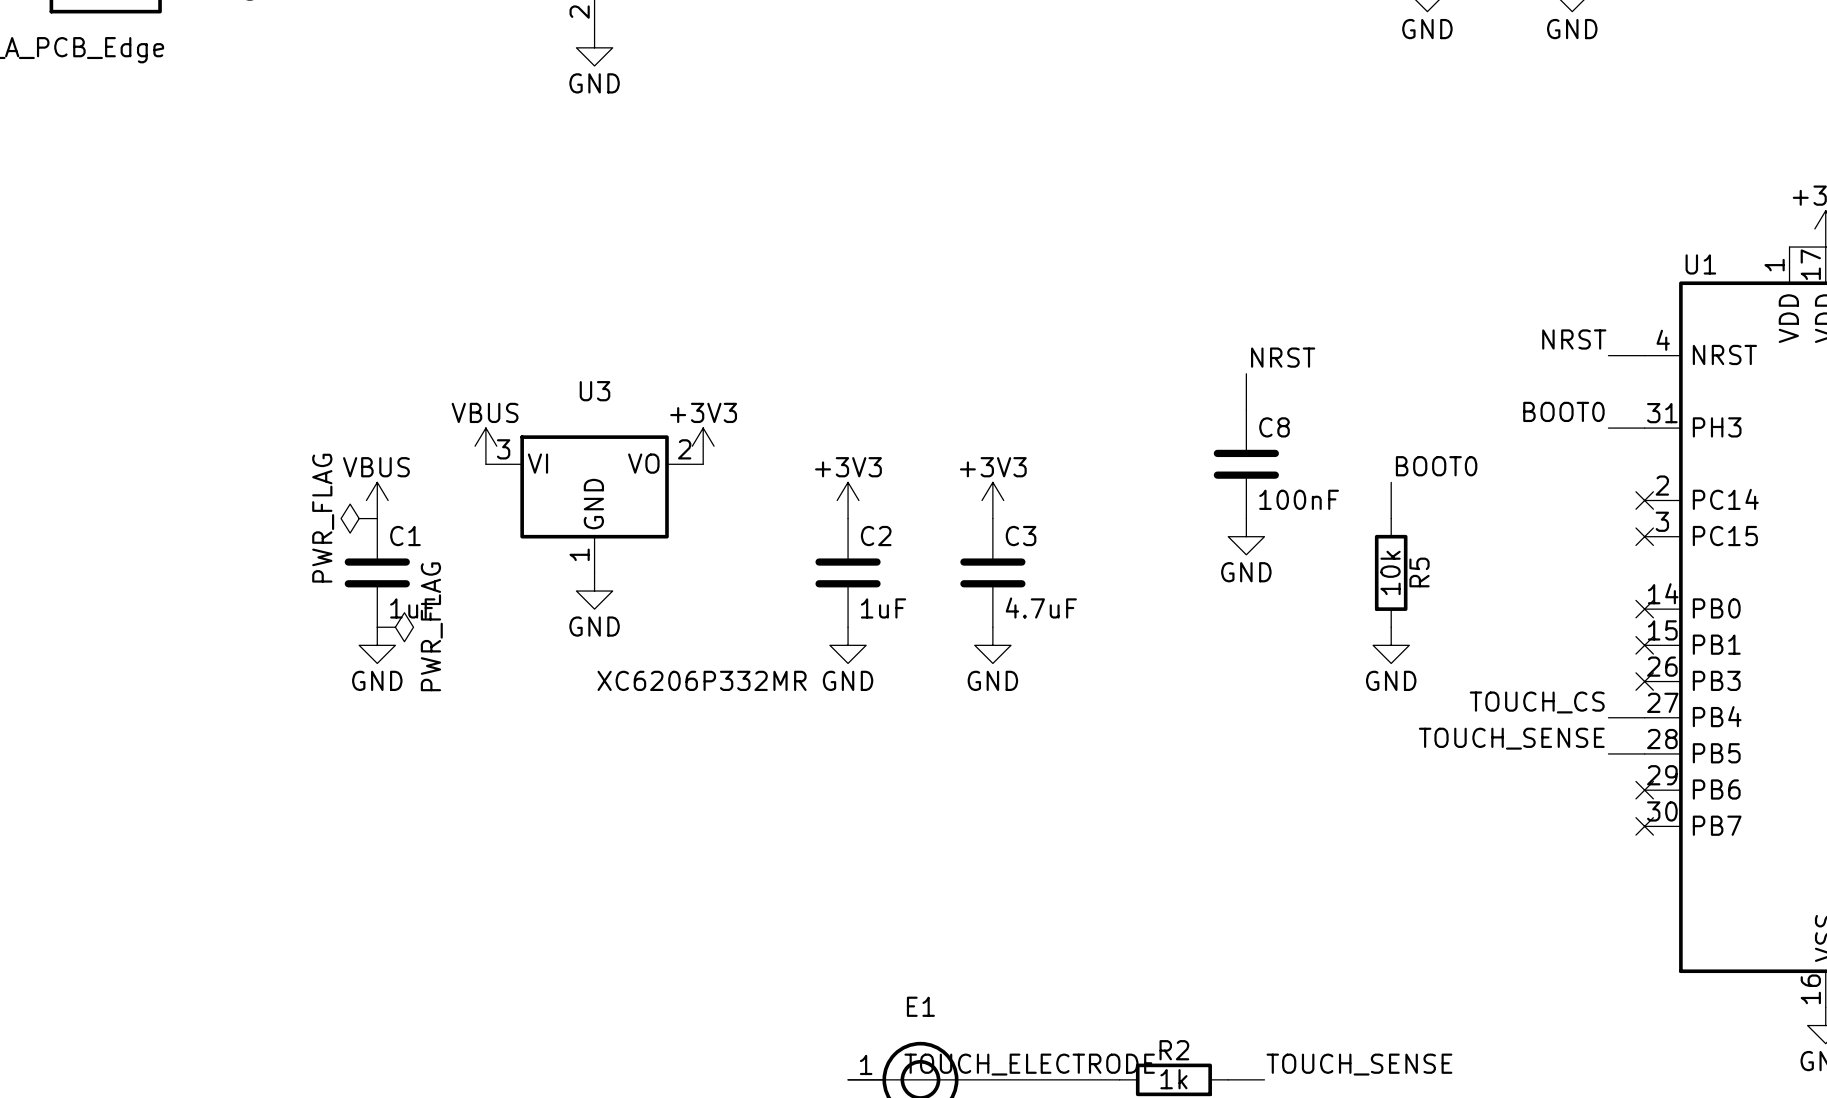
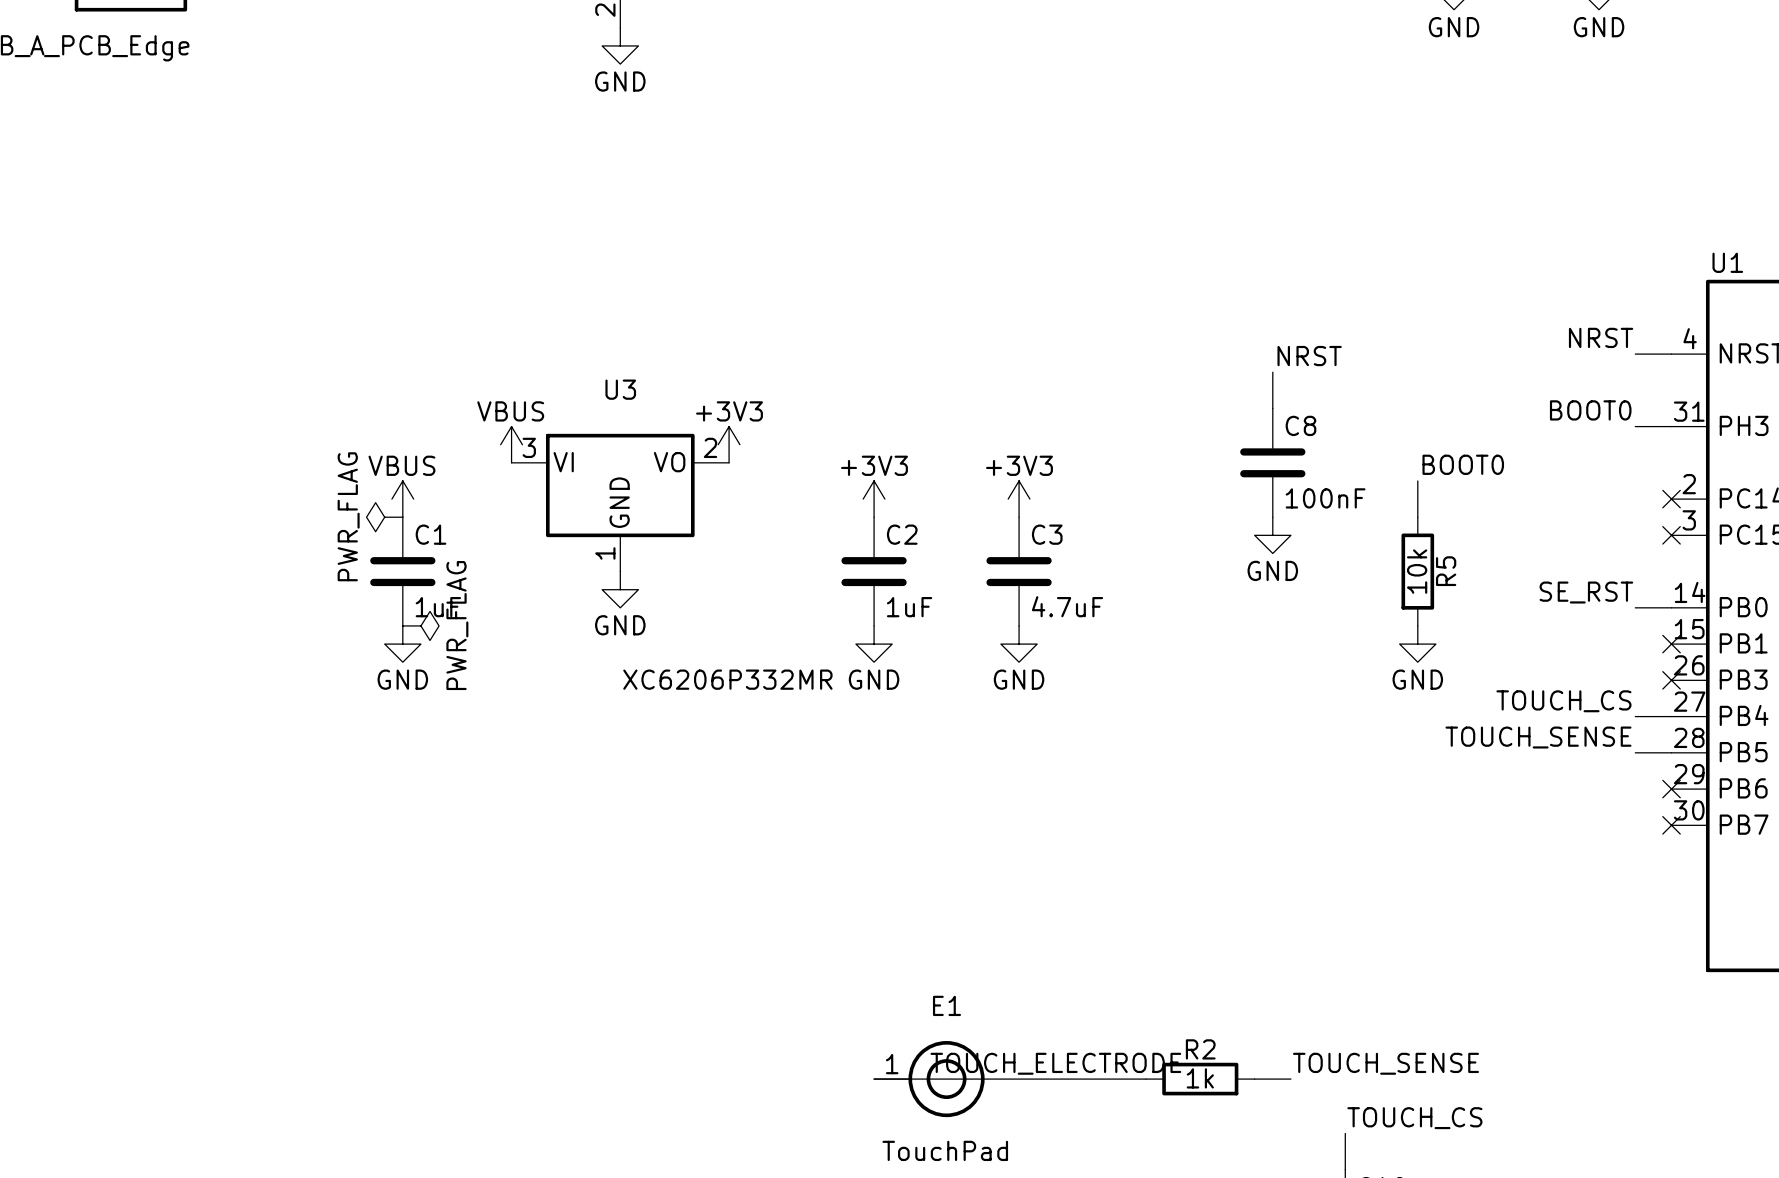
label: none -> SE_RST (1586, 592)
wire: none -> (1635, 607) (1671, 607)
no-connect mark: (1644, 609) -> none

